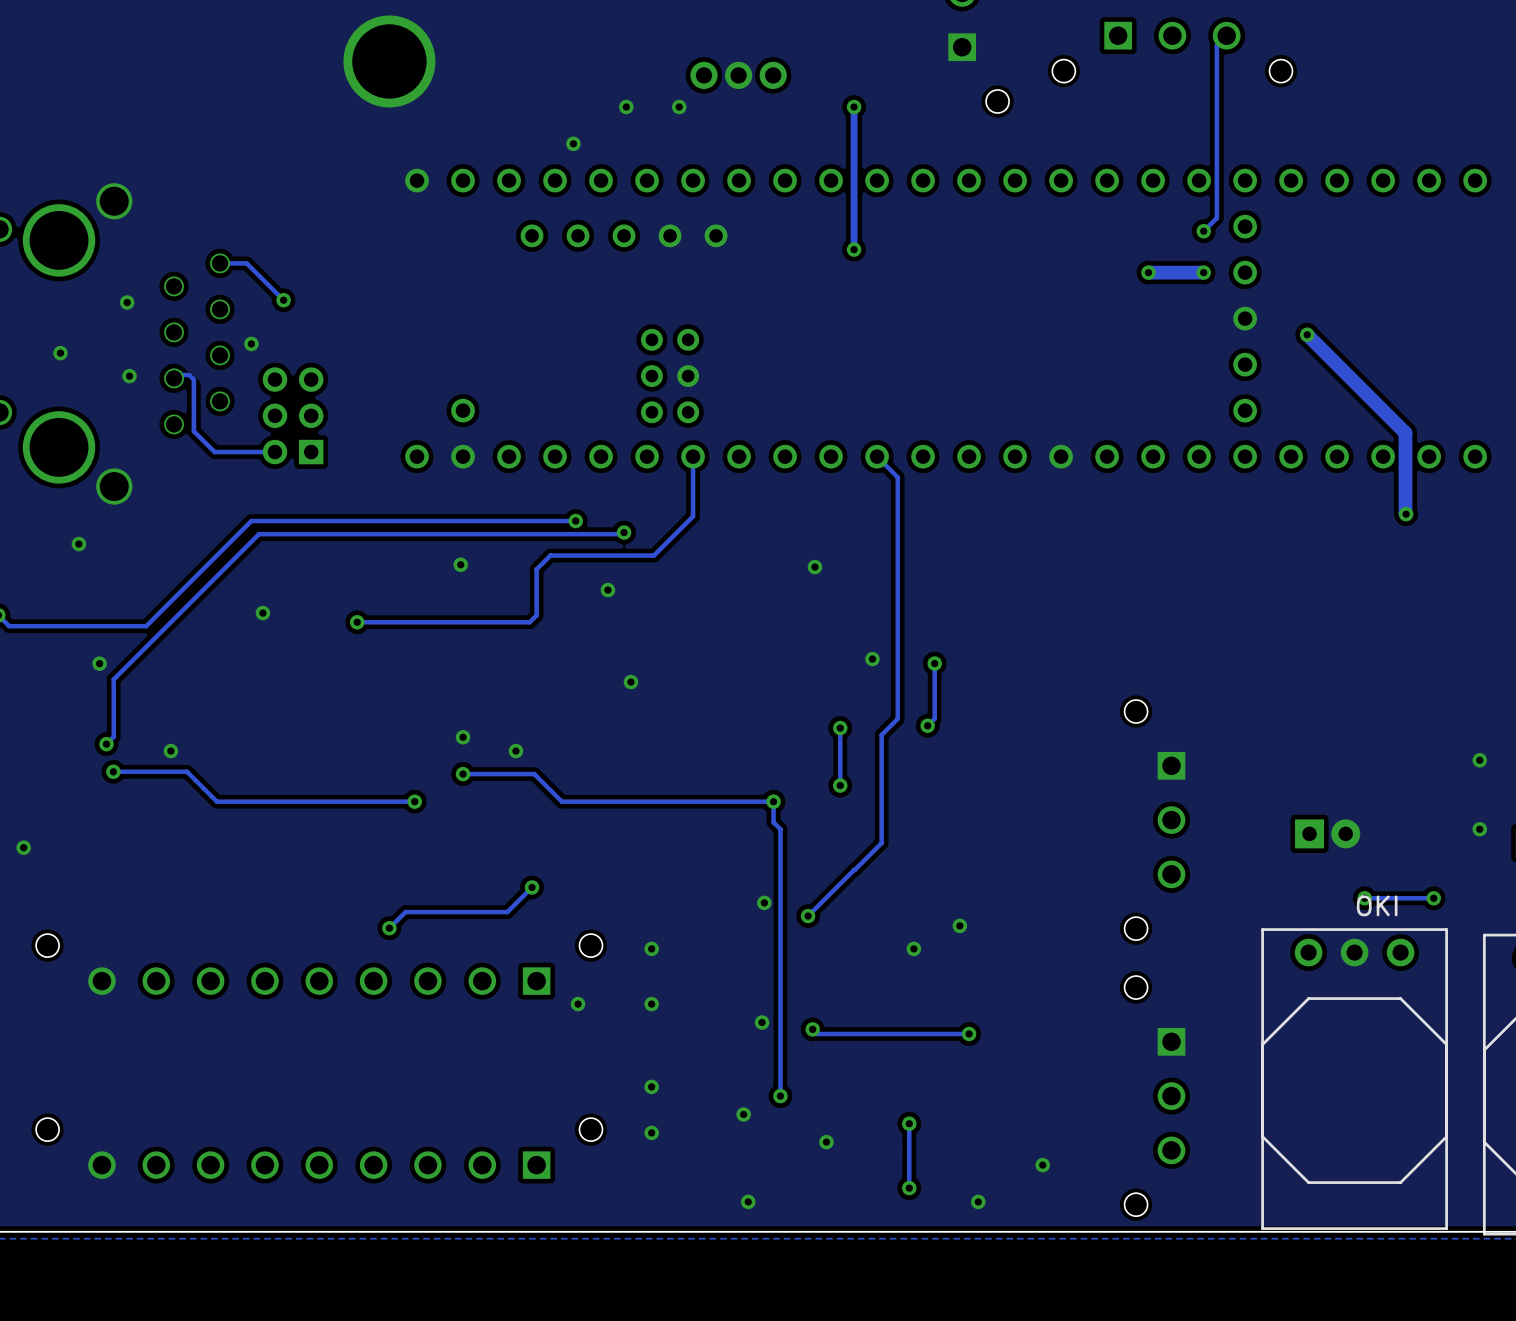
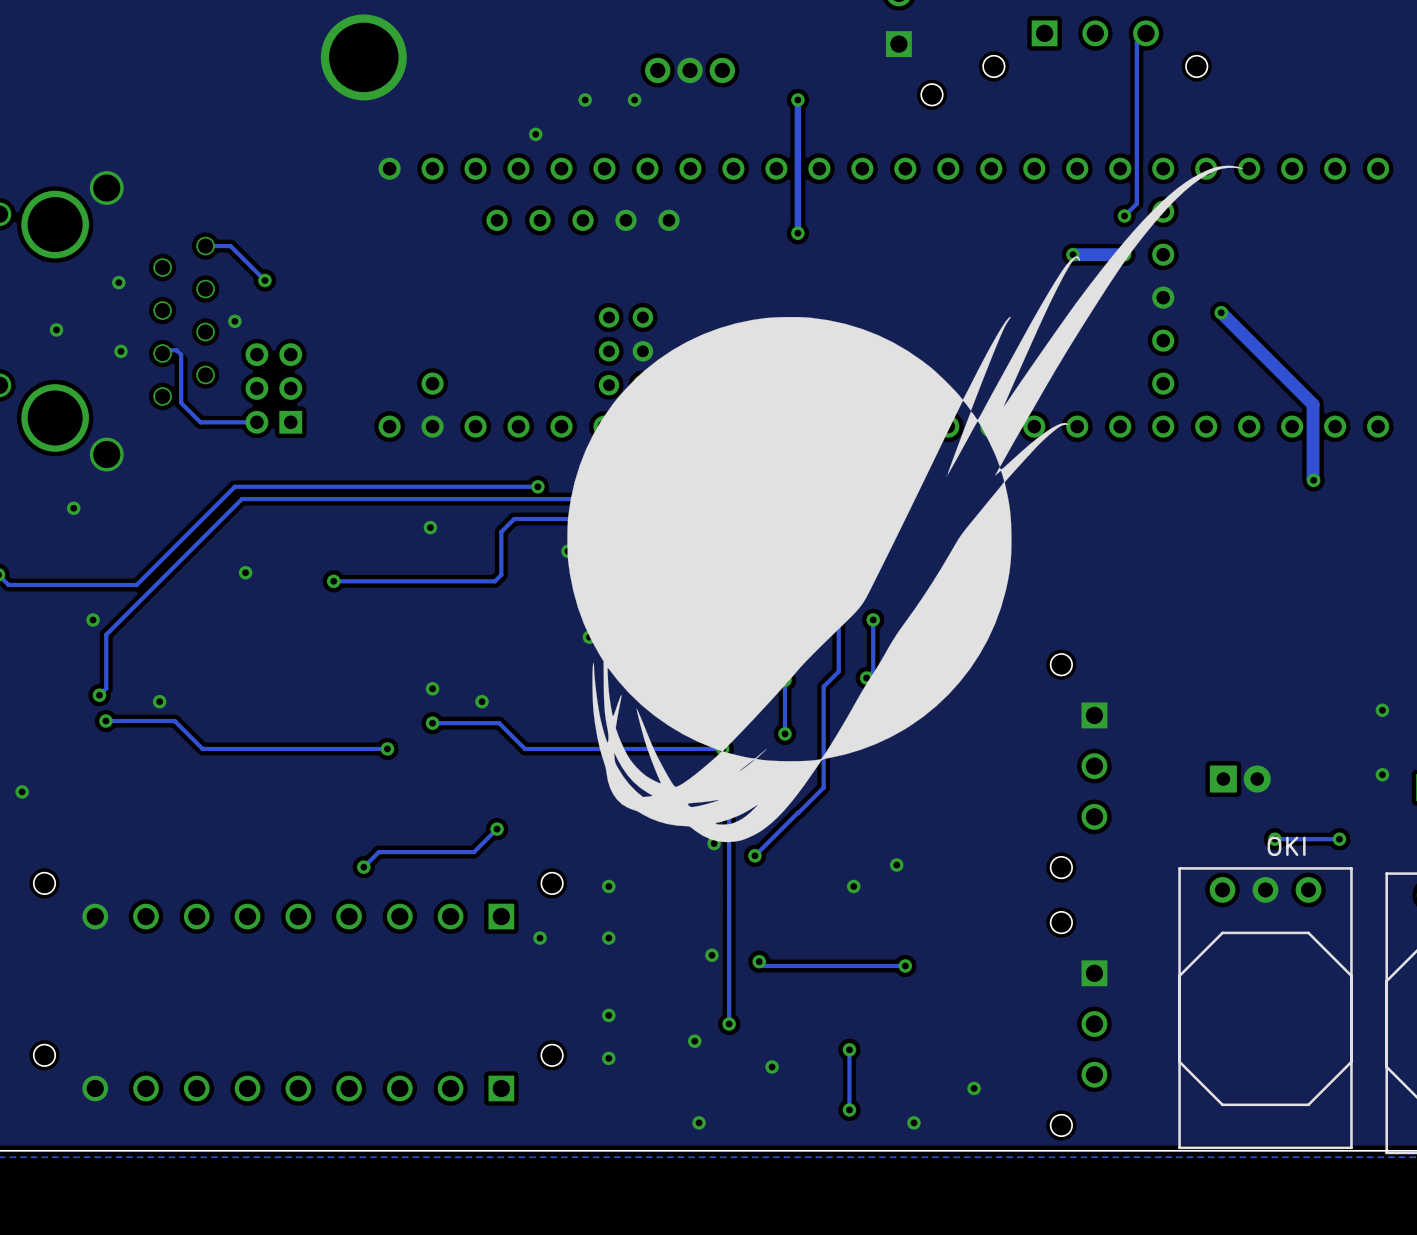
drawing: none -> [567, 165, 1244, 843]

